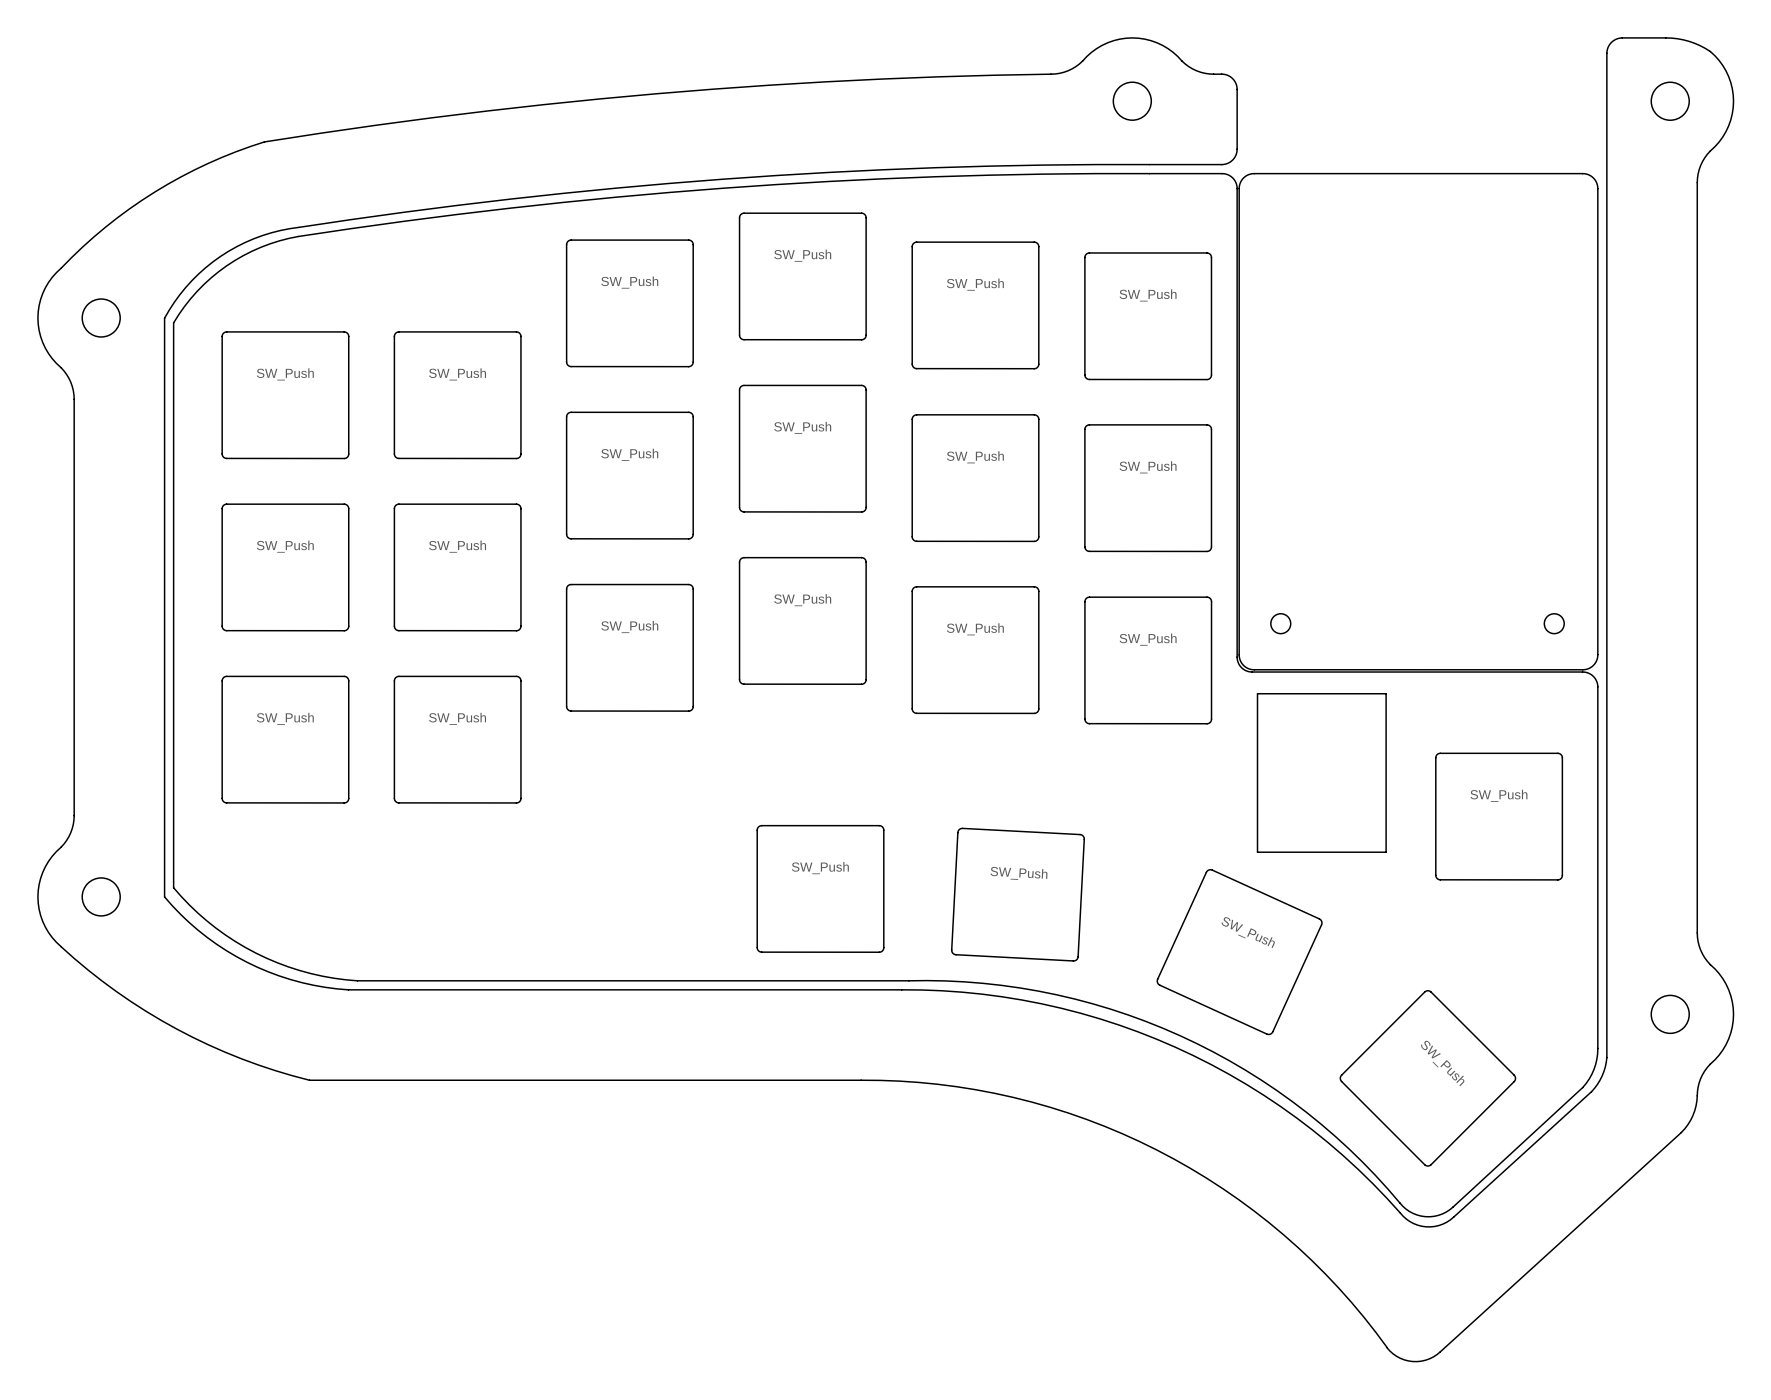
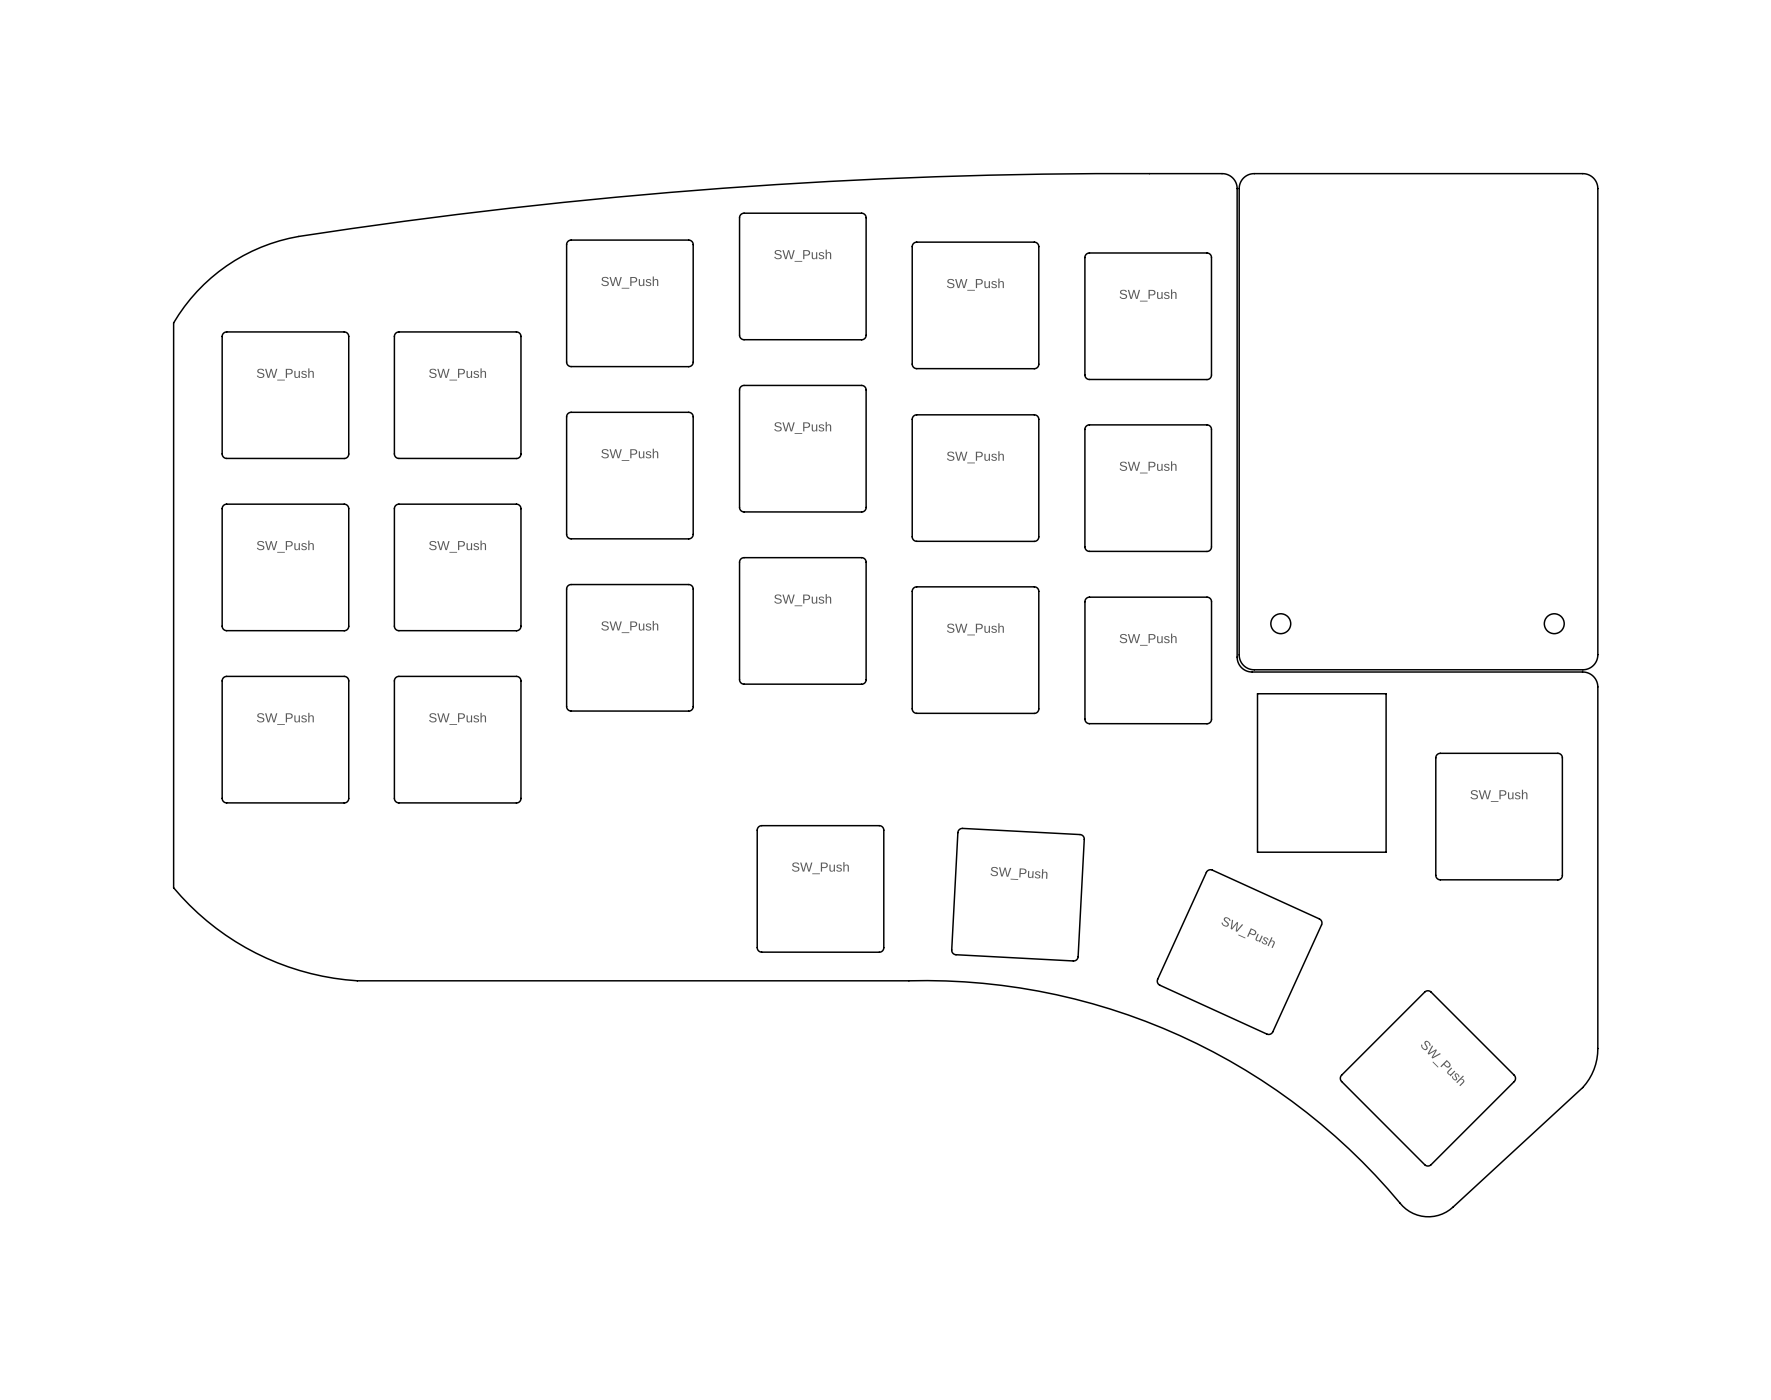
round board edge: [1113, 82, 1152, 121] -> none
round board edge: [1651, 82, 1690, 121] -> none
round board edge: [82, 298, 121, 338] -> none
round board edge: [82, 877, 121, 917] -> none
board edge: (61, 946) (116, 991) (176, 1029) (241, 1058) (309, 1080) (880, 1080) (937, 1084) (975, 1089) (1050, 1107) (1104, 1126) (1139, 1141) (1190, 1168) (1238, 1199) (1283, 1235) (1325, 1274) (1363, 1317) (1387, 1347) -> none
board edge: (61, 946) (45, 927) (40, 915) (37, 896) (40, 878) (45, 866) (66, 840) (73, 819) (74, 399) (68, 378) (52, 358) (42, 342) (38, 324) (38, 311) (42, 293) (52, 277) (105, 227) (141, 200) (180, 176) (221, 157) (264, 141) (431, 117) (656, 93) (881, 79) (1055, 73) (1072, 68) (1091, 52) (1107, 42) (1126, 38) (1144, 39) (1167, 48) (1185, 64) (1196, 70) (1225, 74) (1234, 81) (1237, 89) (1237, 149) (1235, 156) (1231, 161) (1221, 164) (1042, 165) (882, 169) (722, 179) (563, 193) (404, 212) (280, 230) (236, 246) (205, 267) (179, 294) (164, 318) (164, 896) (197, 930) (236, 956) (257, 967) (290, 979) (336, 988) (921, 989) (982, 994) (1061, 1008) (1100, 1018) (1156, 1039) (1229, 1074) (1280, 1106) (1328, 1142) (1358, 1169) (1409, 1221) (1426, 1226) (1438, 1225) (1446, 1222) (1591, 1091) (1600, 1080) (1606, 1062) (1607, 51) (1611, 42) (1620, 38) (1671, 38) (1689, 41) (1710, 51) (1719, 60) (1730, 82) (1733, 101) (1728, 125) (1719, 142) (1702, 161) (1697, 182) (1697, 933) (1702, 954) (1719, 973) (1728, 989) (1733, 1008) (1732, 1026) (1722, 1050) (1702, 1074) (1698, 1087) (1694, 1110) (1681, 1132) (1437, 1354) (1425, 1360) (1412, 1361) (1400, 1358) (1387, 1347) -> none
round board edge: [1651, 995, 1690, 1034] -> none

